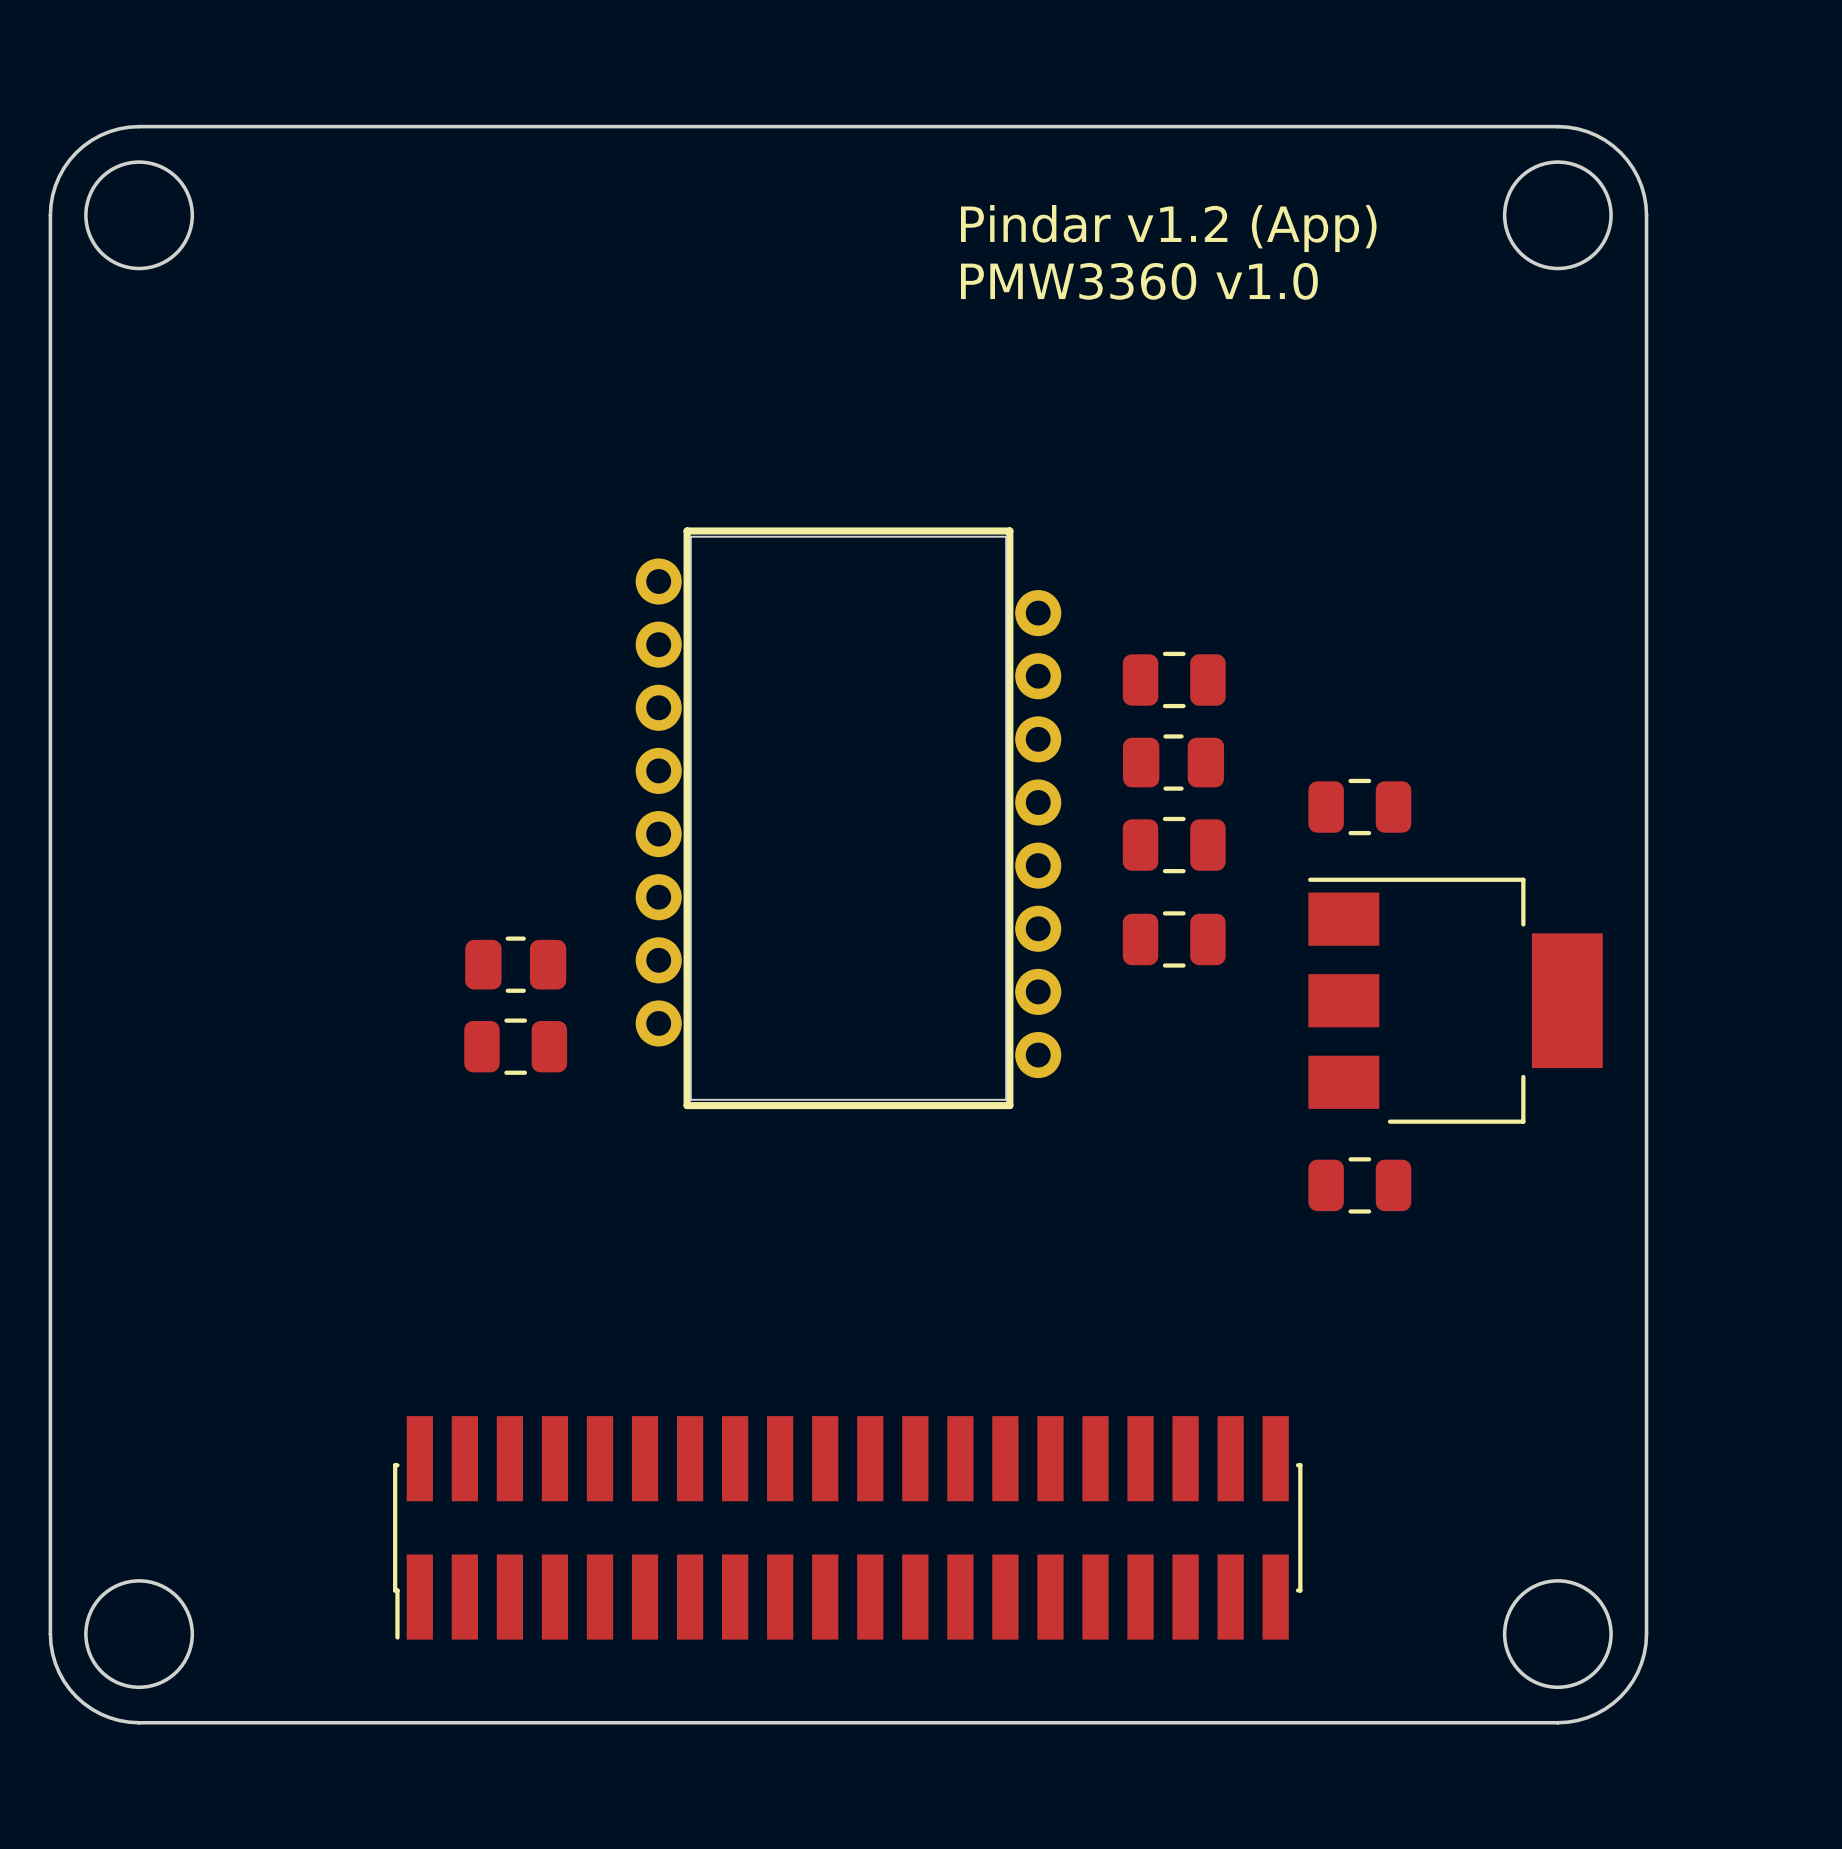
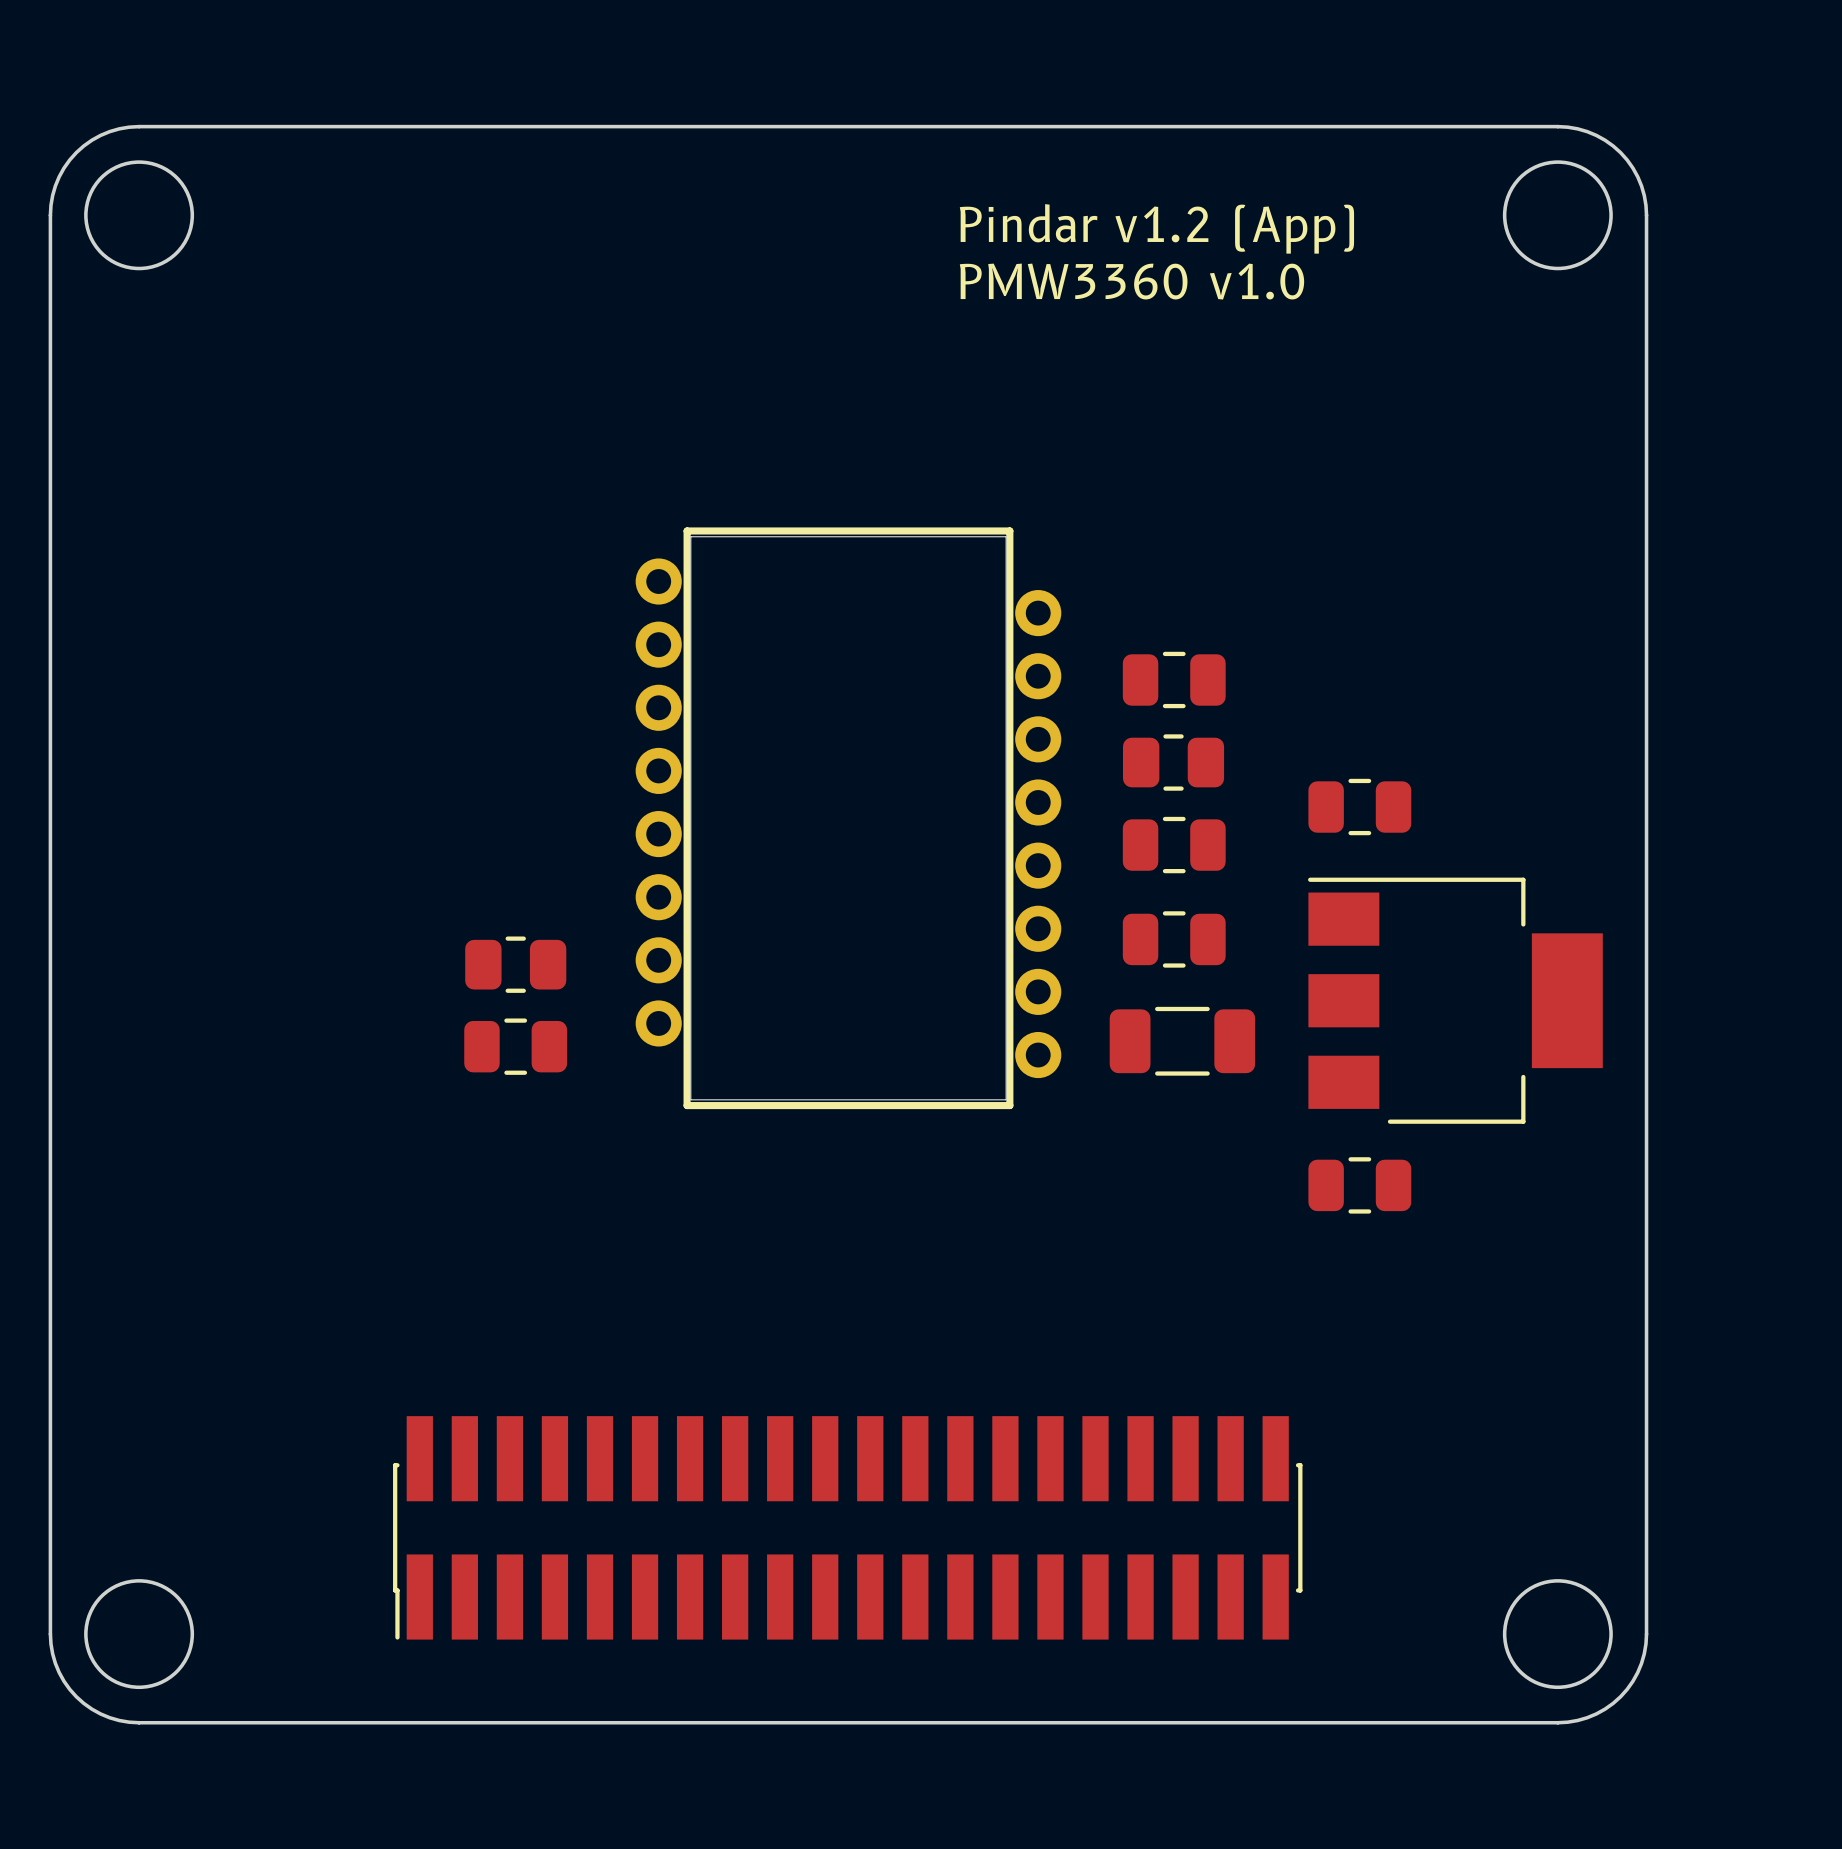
part: none -> (1182, 1041)

